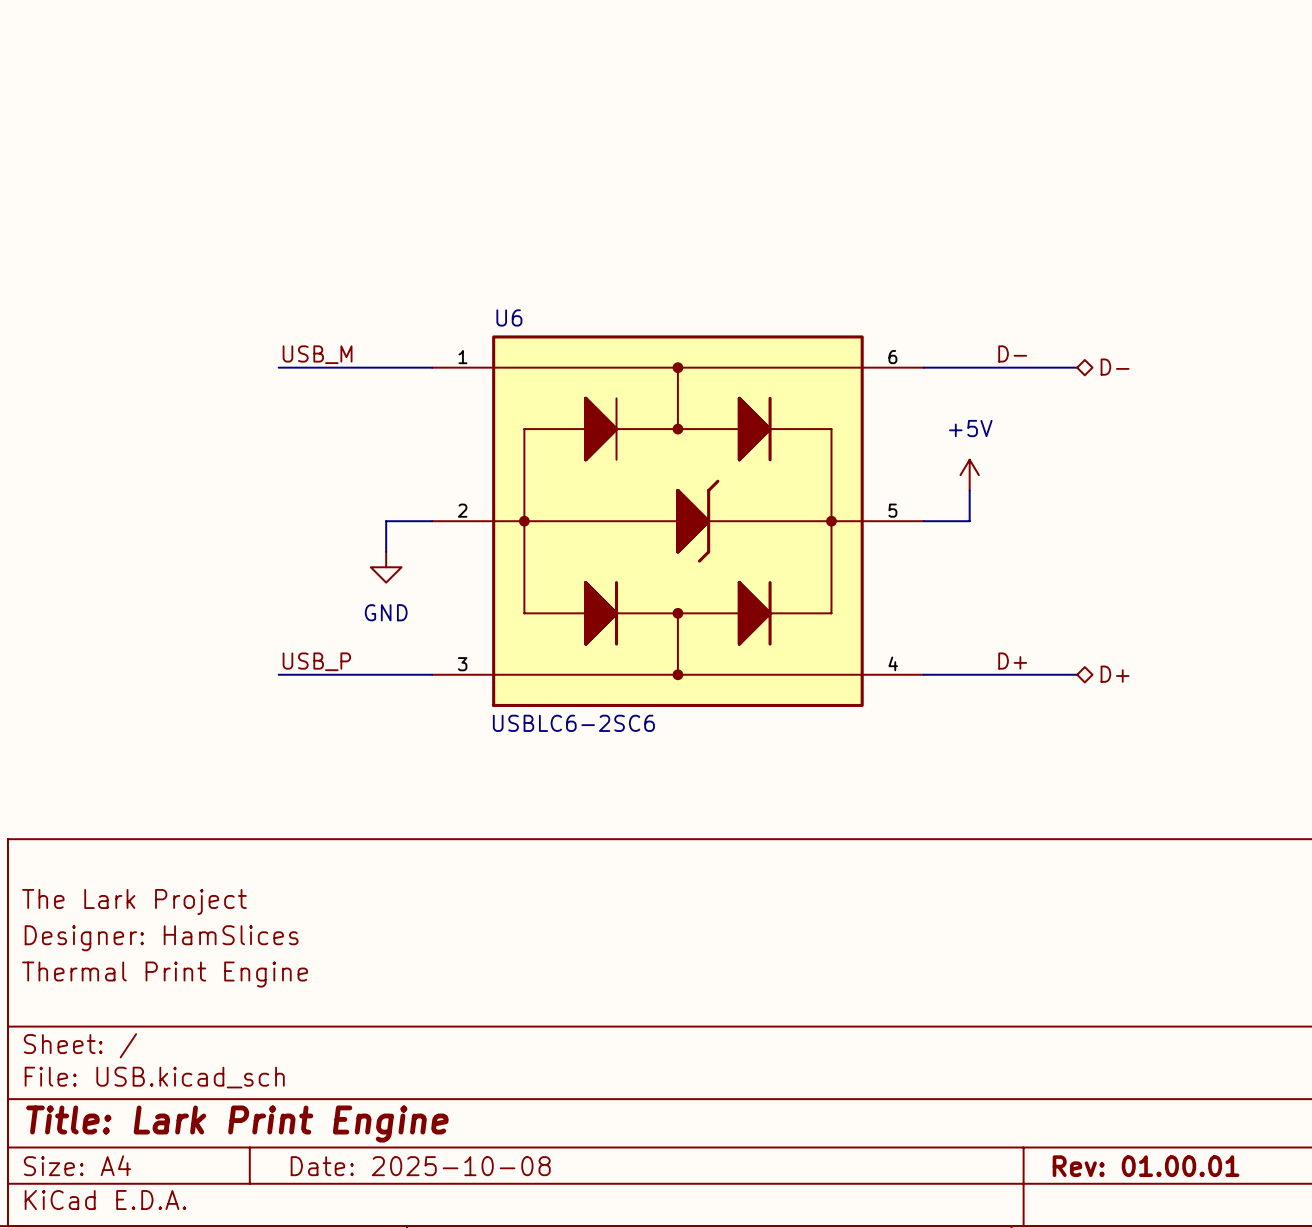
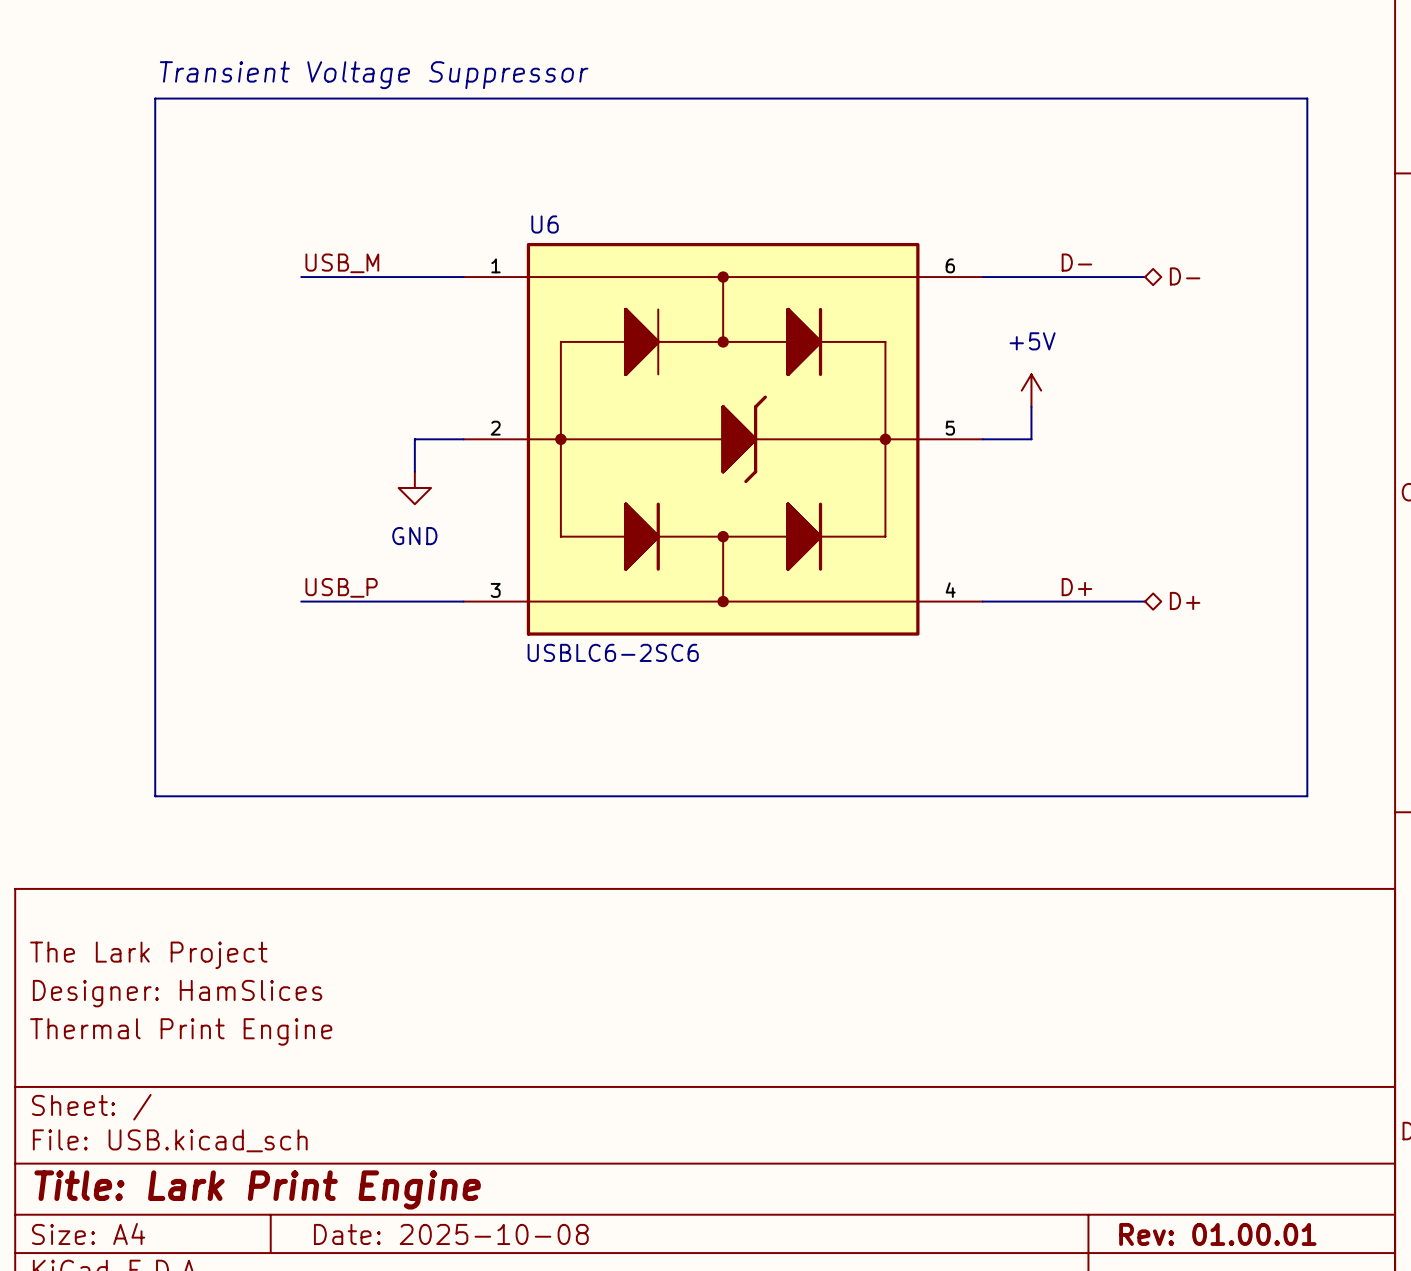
text: none -> Transient Voltage Suppressor (374, 75)
line: none -> (155, 98) (1307, 98) (1307, 796) (155, 796) (155, 98)
label position: D- (1012, 353) -> D- (1076, 262)
label position: USB_M (317, 354) -> USB_M (342, 263)
wire: (278, 367) (432, 367) -> (301, 277) (463, 277)
wire: (923, 367) (1077, 367) -> (982, 277) (1145, 277)
hierarchical label position: D- (1115, 367) -> D- (1185, 276)
power symbol position: +5V (969, 475) -> +5V (1031, 390)
wire: (969, 490) (969, 521) (923, 521) -> (1031, 406) (1031, 439) (982, 439)
wire: (432, 521) (386, 521) (386, 551) -> (463, 439) (414, 439) (414, 471)
U6 position: (677, 521) -> (723, 439)
power symbol position: GND (386, 567) -> GND (414, 487)
label position: USB_P (316, 661) -> USB_P (341, 587)
label position: D+ (1012, 661) -> D+ (1076, 587)
wire: (278, 674) (432, 674) -> (301, 601) (463, 601)
wire: (923, 674) (1077, 674) -> (982, 601) (1145, 601)
hierarchical label position: D+ (1115, 674) -> D+ (1185, 600)

